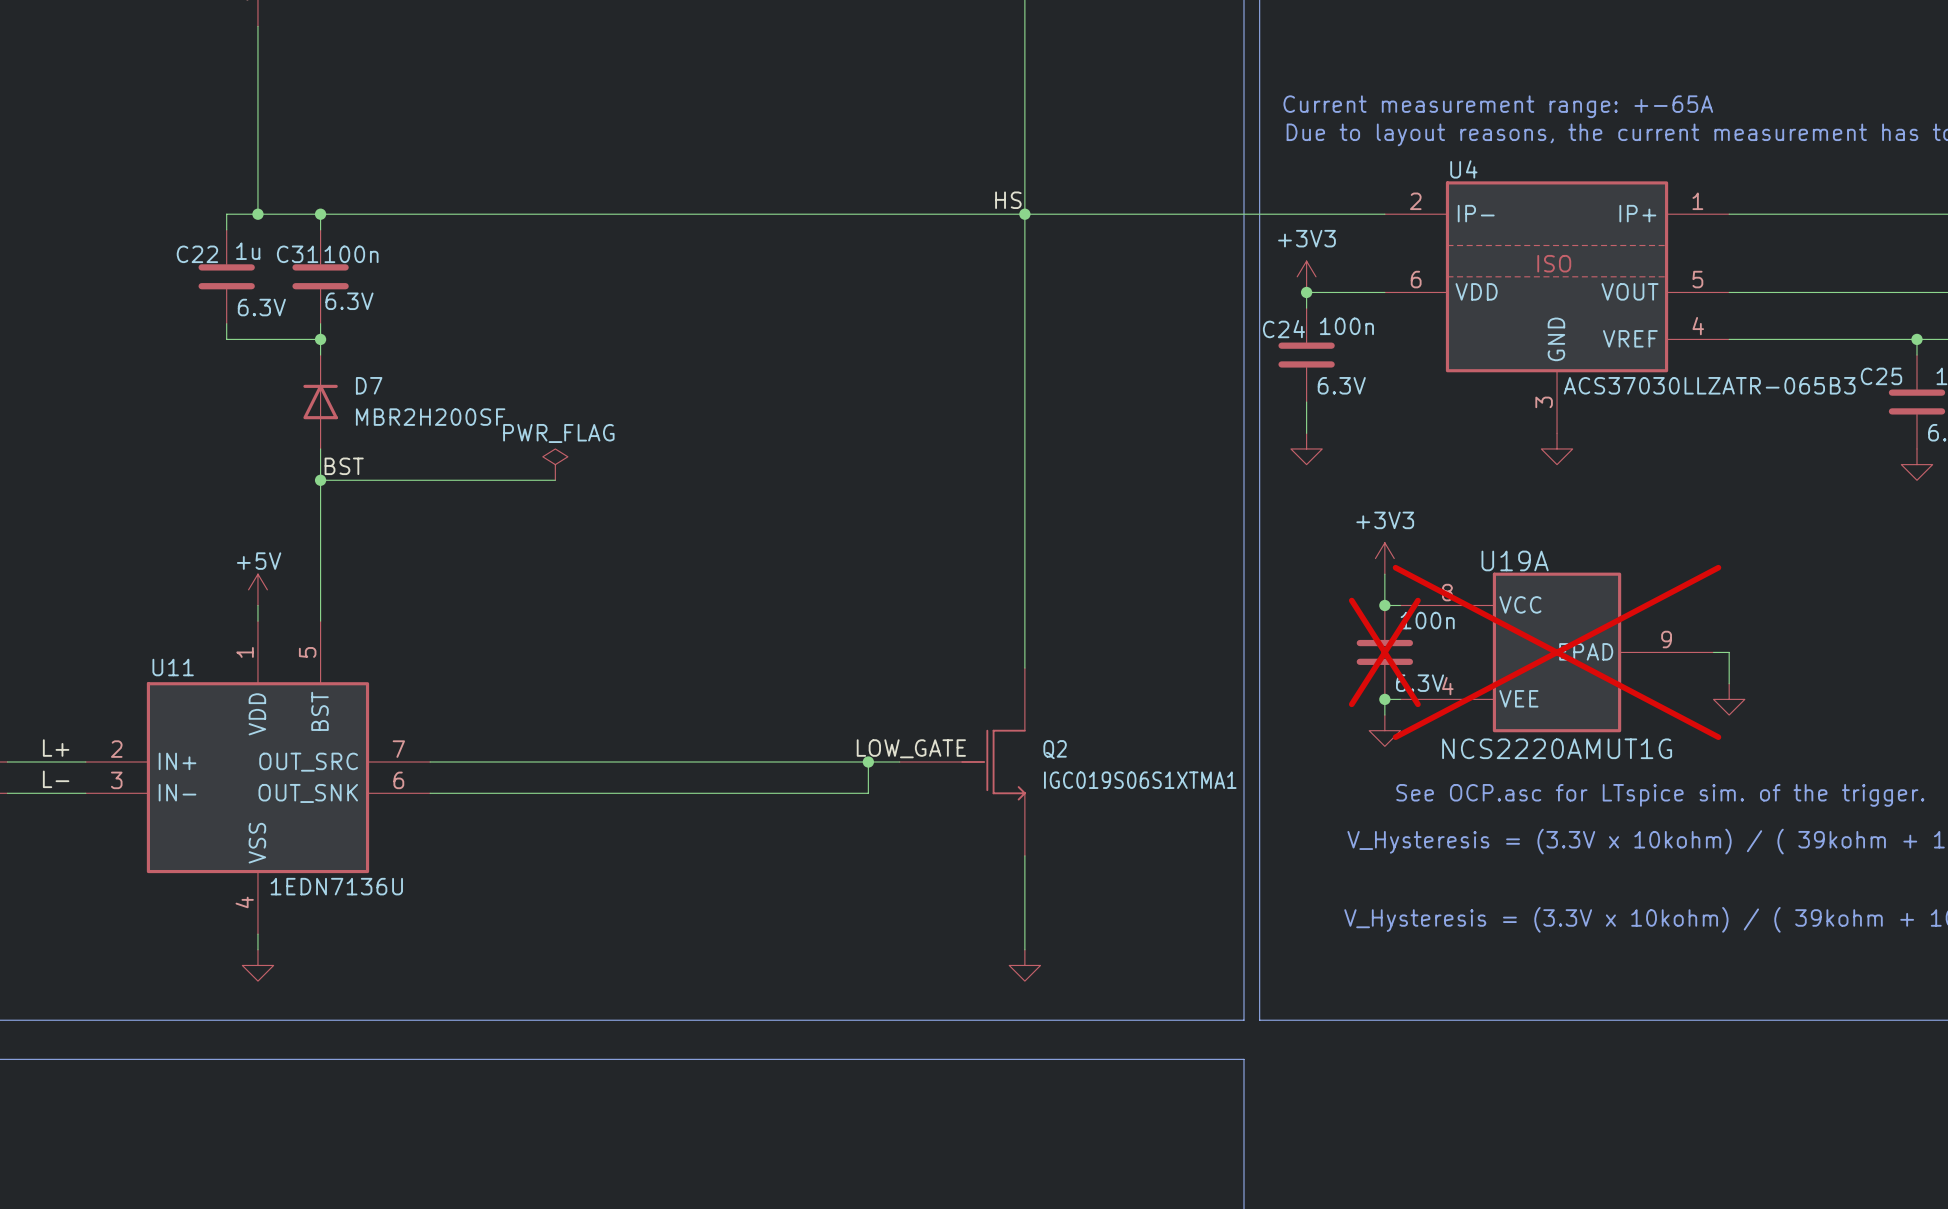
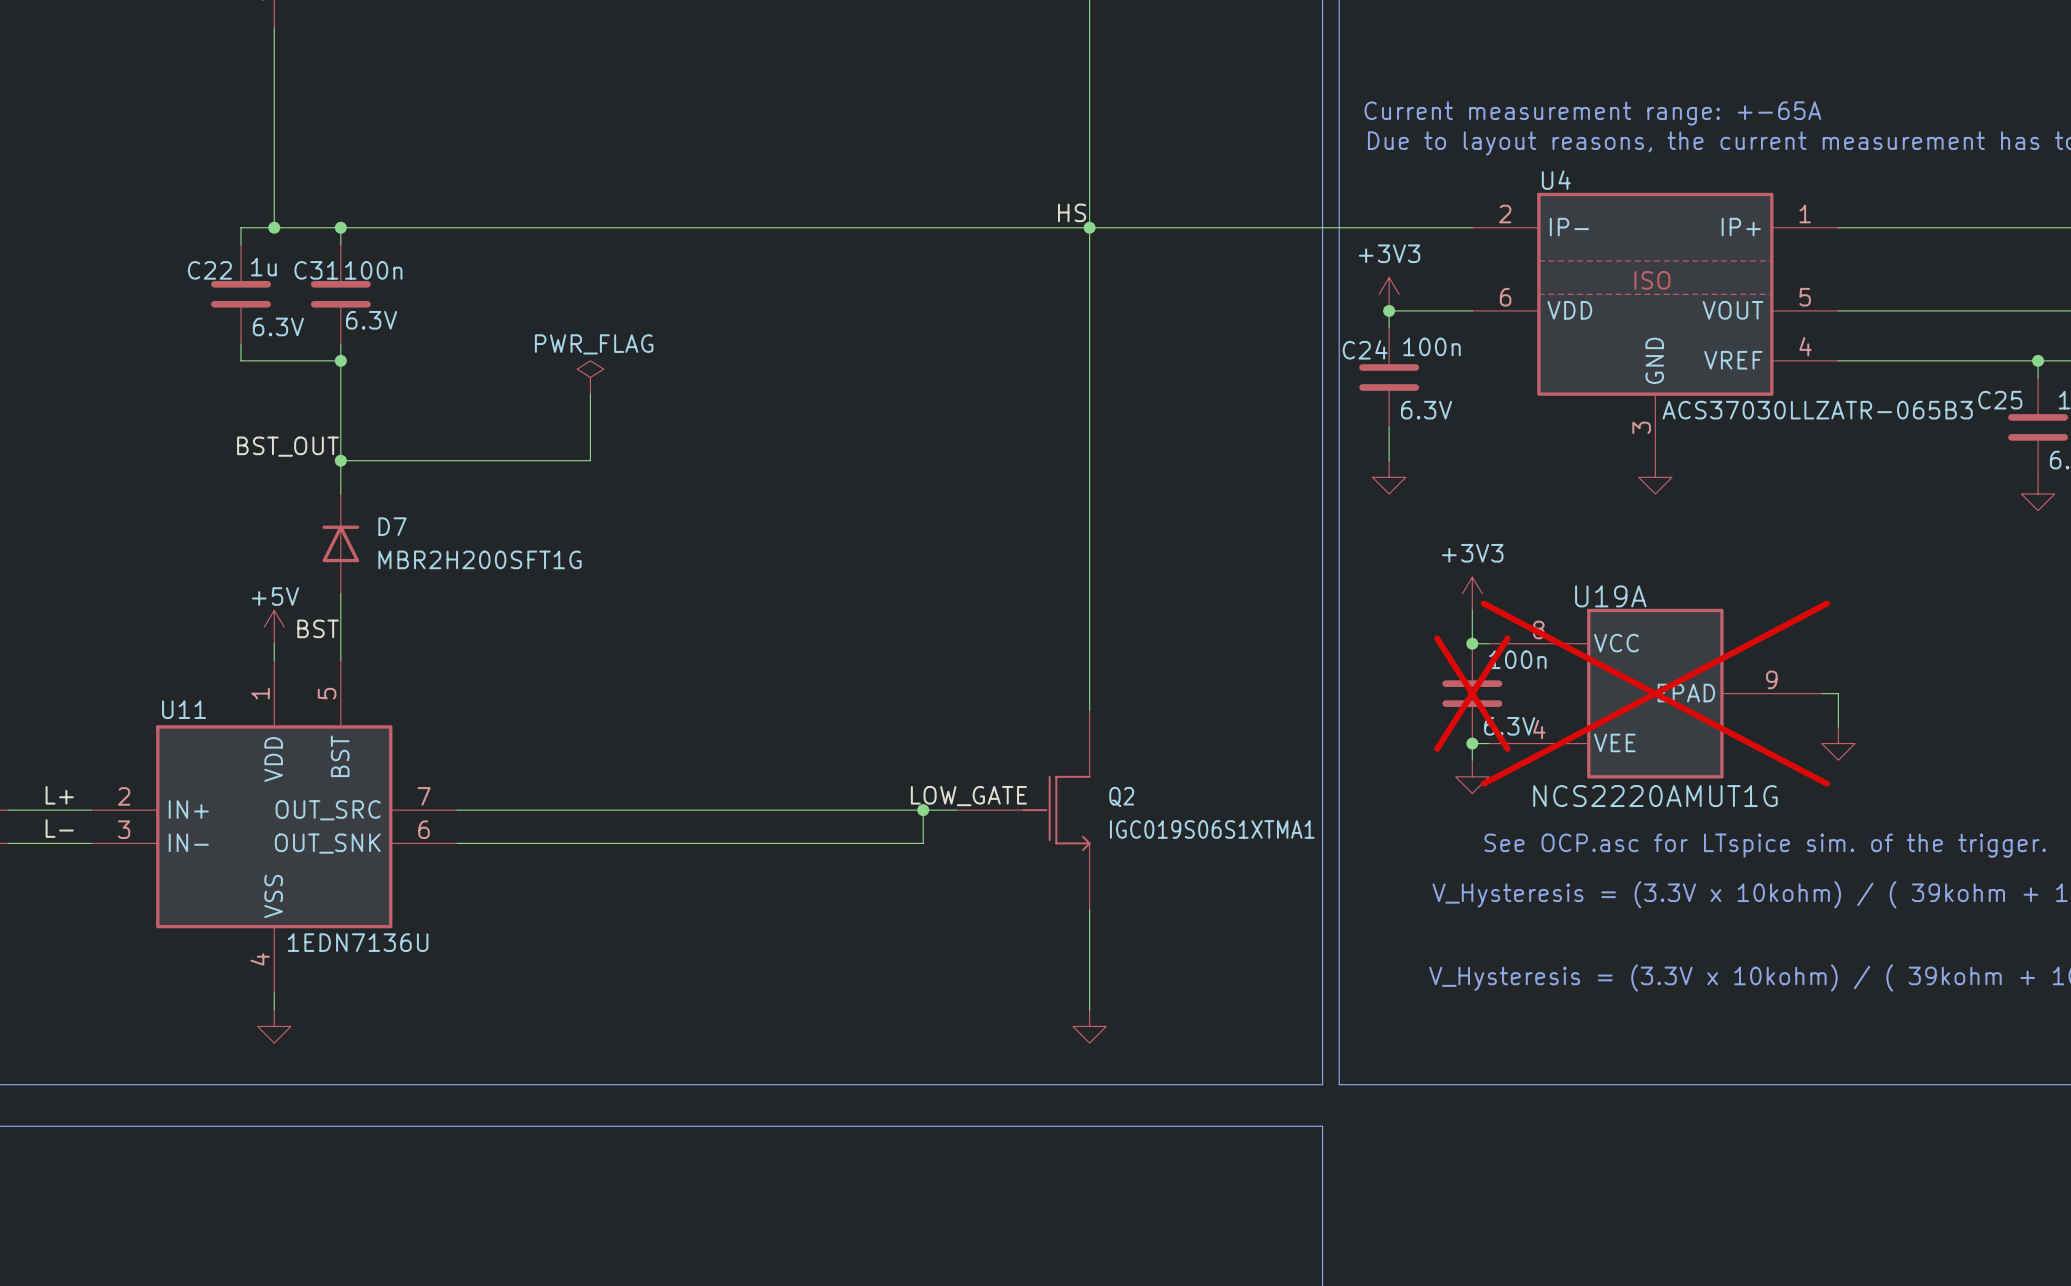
wire: none -> (590, 394) (590, 460) (340, 460)
D7 position: (320, 402) -> (340, 543)
D7 value: MBR2H200SF (430, 417) -> MBR2H200SFT1G (480, 559)
label: none -> BST_OUT (288, 446)
power symbol position: PWR_FLAG (555, 464) -> PWR_FLAG (590, 377)
label position: BST (344, 466) -> BST (318, 628)
wire: (320, 480) (555, 480) -> none
junction position: (320, 480) -> (340, 460)

